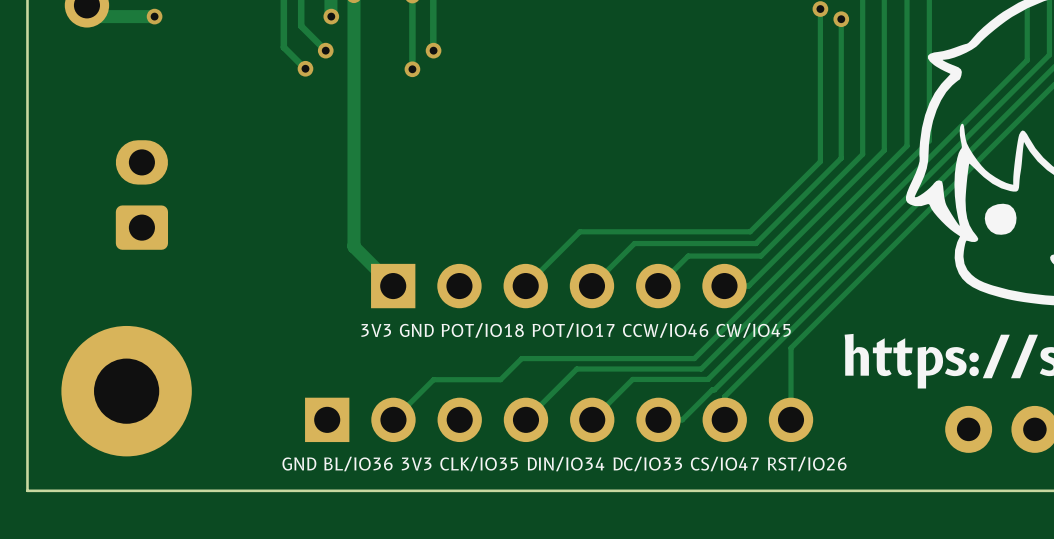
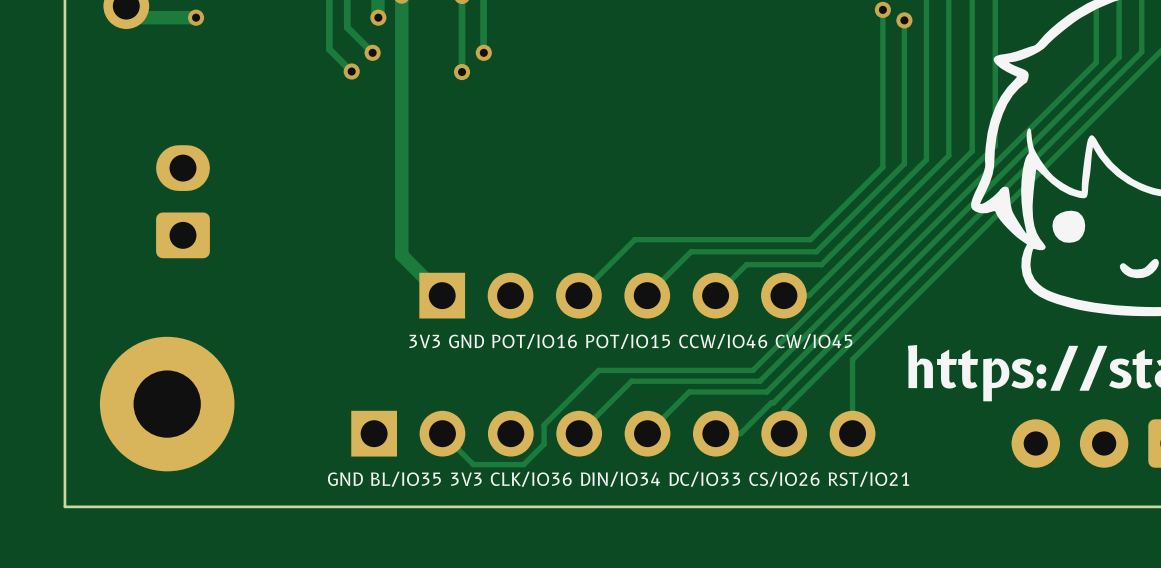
text: 3V3 GND POT/IO18 POT/IO17 CCW/IO46 CW/IO45 (576, 330) -> 3V3 GND POT/IO16 POT/IO15 CCW/IO46 CW/IO45 (630, 341)
track: (544, 358) (521, 358) (500, 379) (433, 379) (393, 419) -> (598, 370) (544, 424) (544, 444) (523, 464) (473, 464) (442, 433)
text: GND BL/IO36 3V3 CLK/IO35 DIN/IO34 DC/IO33 CS/IO47 RST/IO26 (564, 464) -> GND BL/IO35 3V3 CLK/IO36 DIN/IO34 DC/IO33 CS/IO26 RST/IO21 (618, 479)

